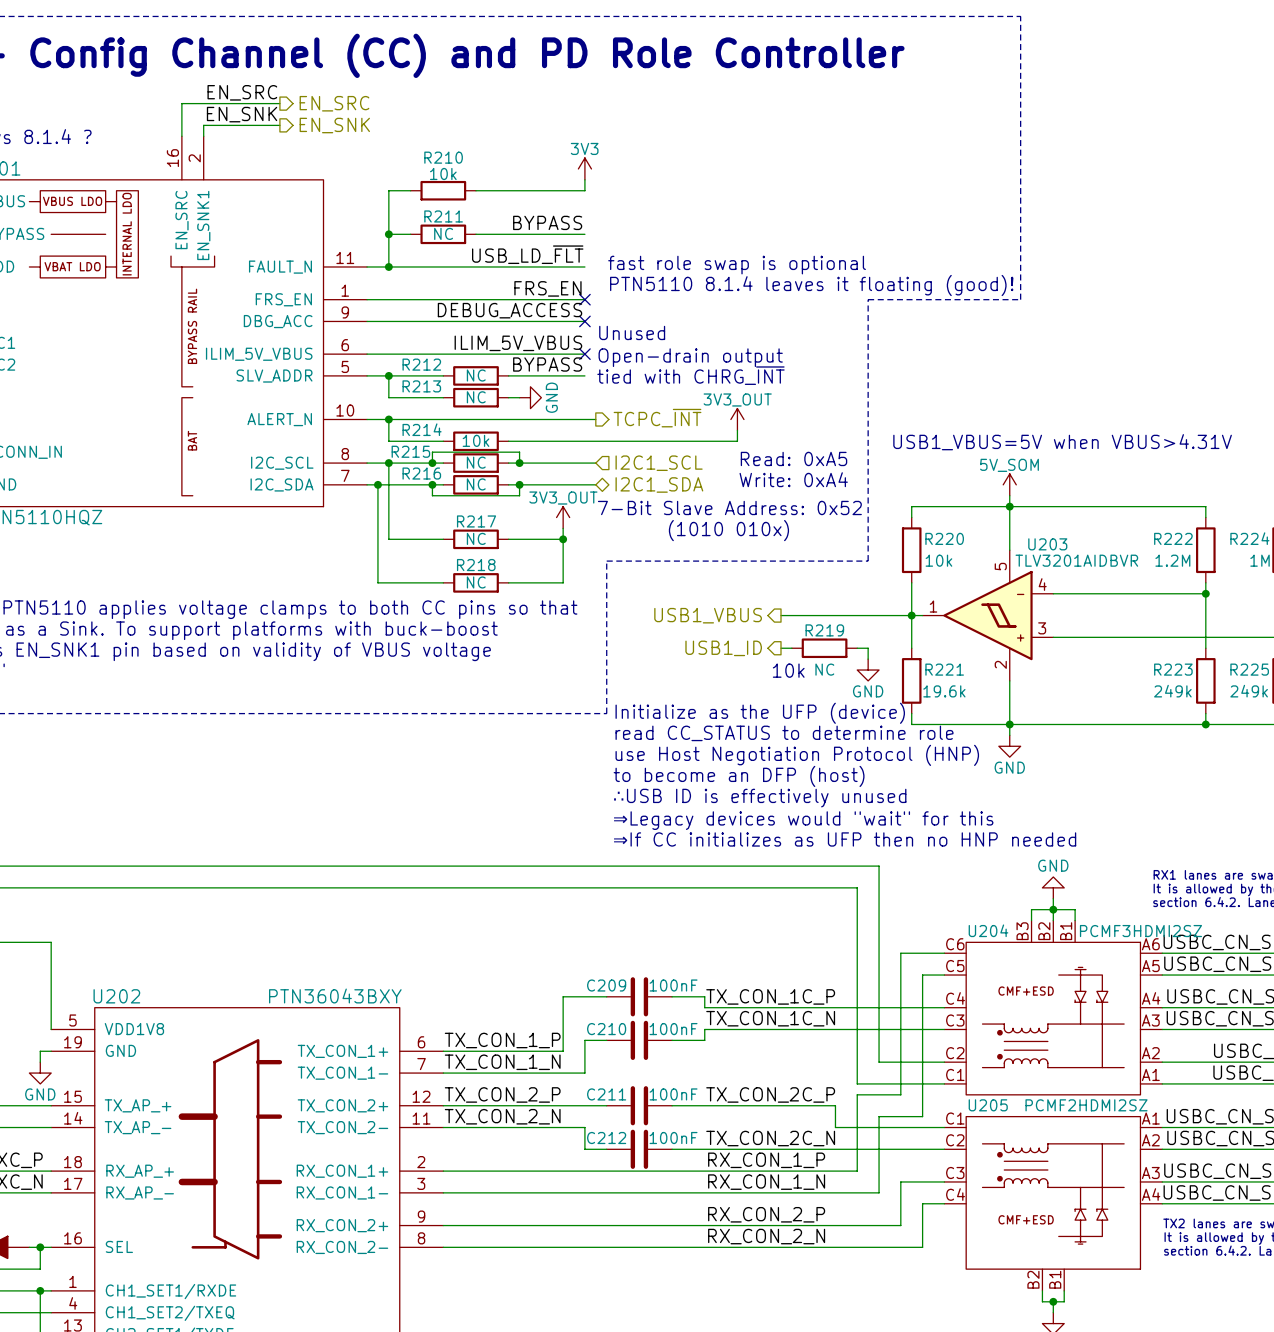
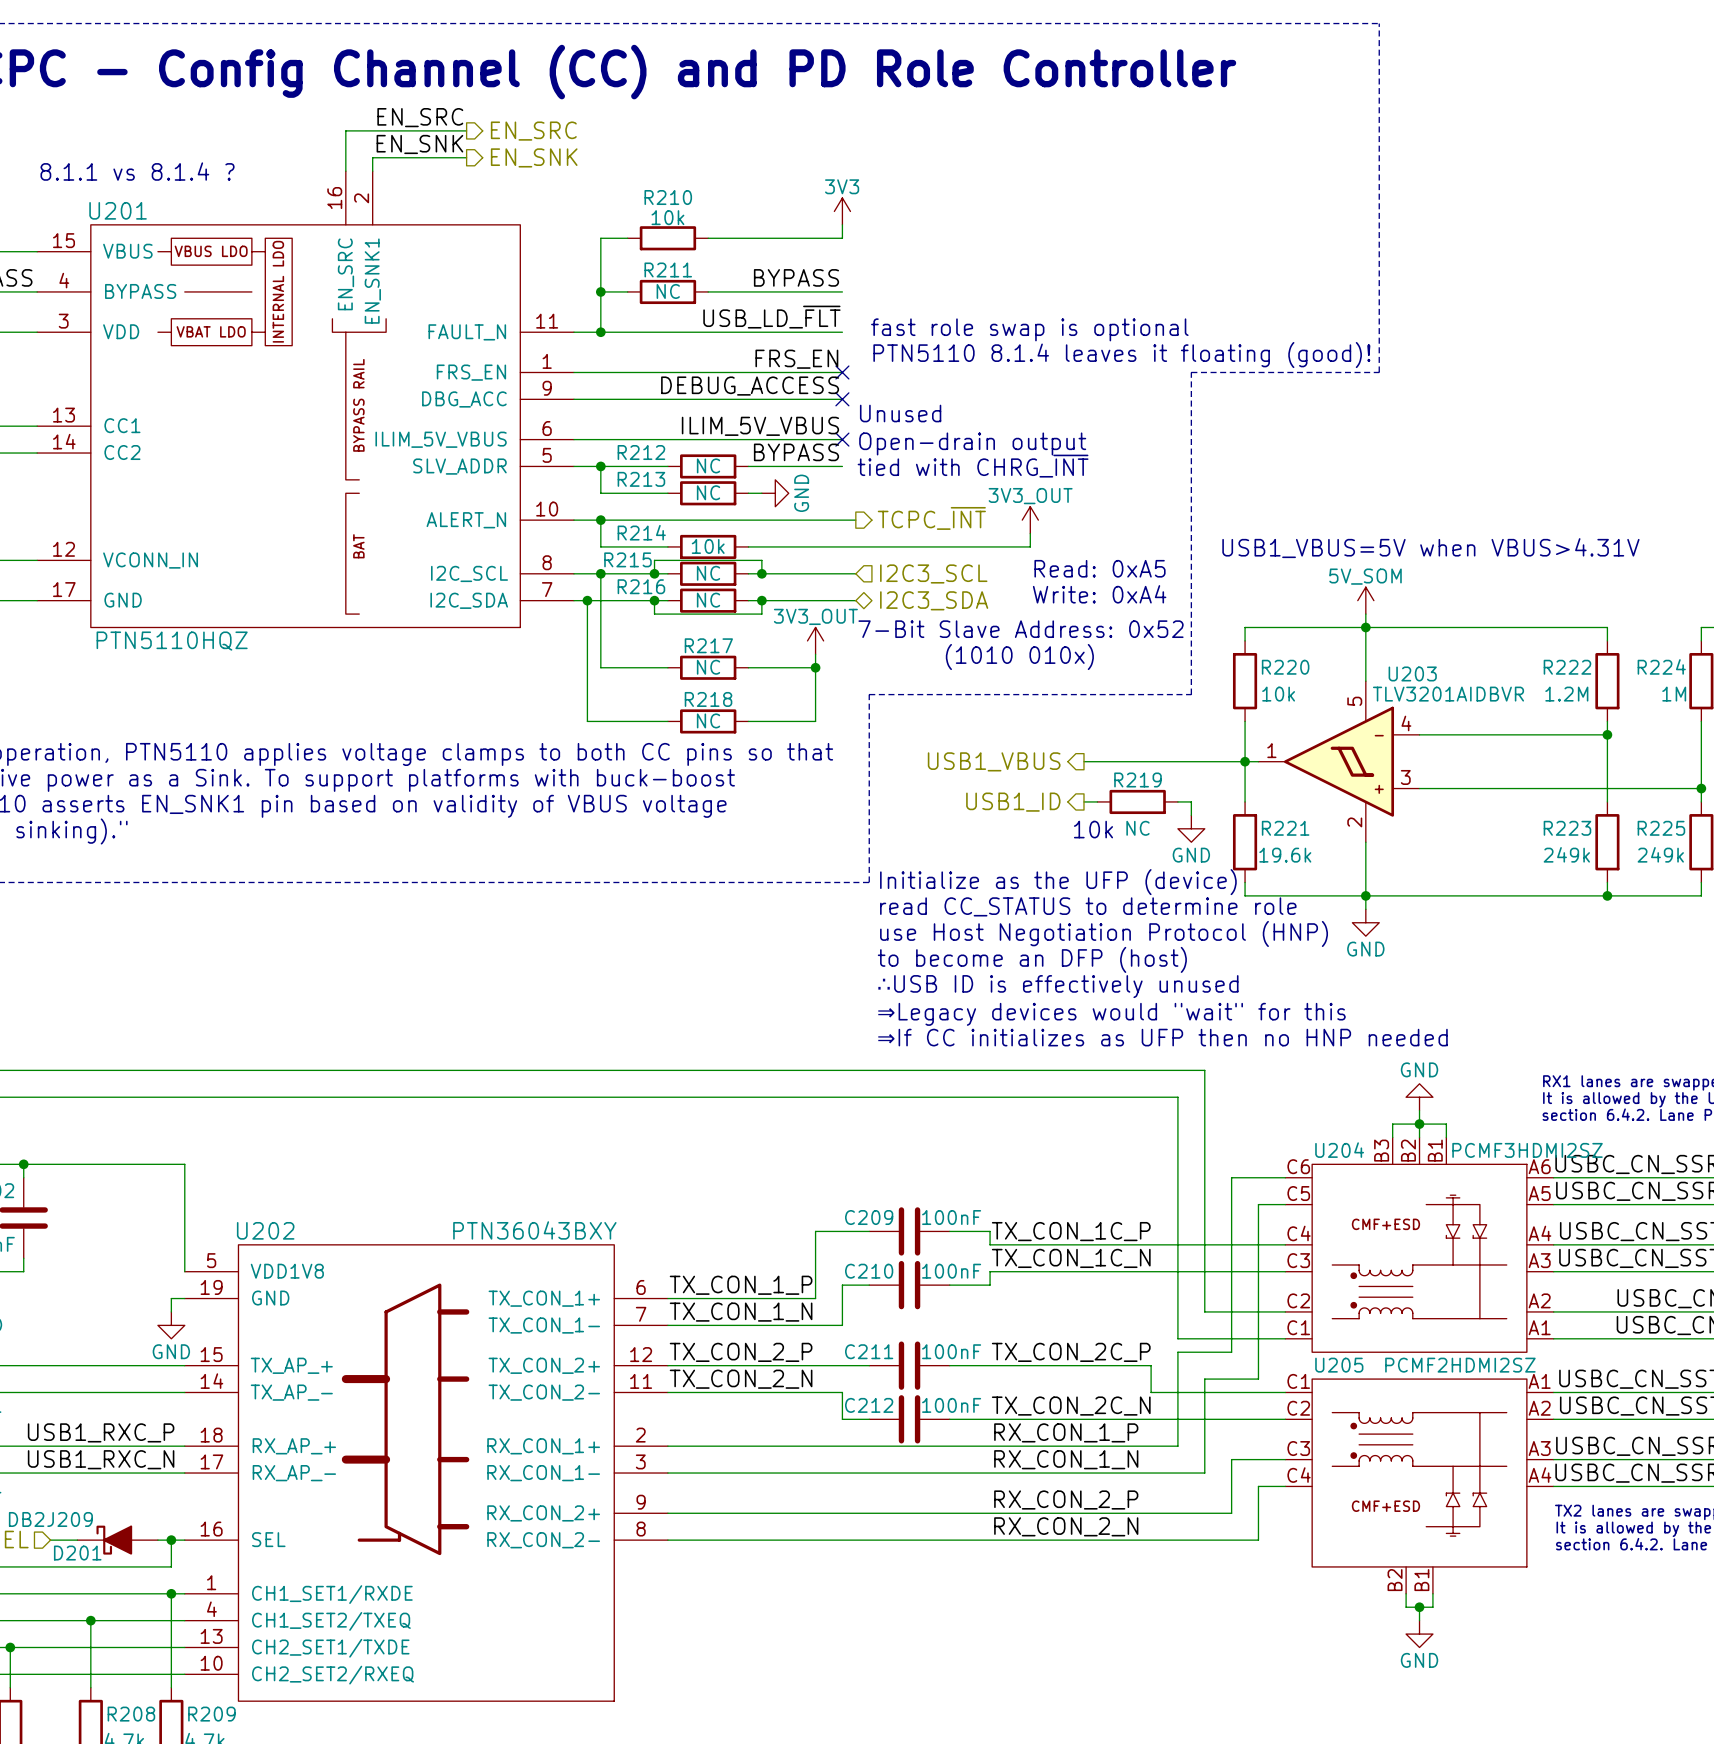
hierarchical label: I2C1_SCL (659, 463) -> I2C3_SCL (933, 573)
hierarchical label: I2C1_SDA (659, 484) -> I2C3_SDA (934, 600)

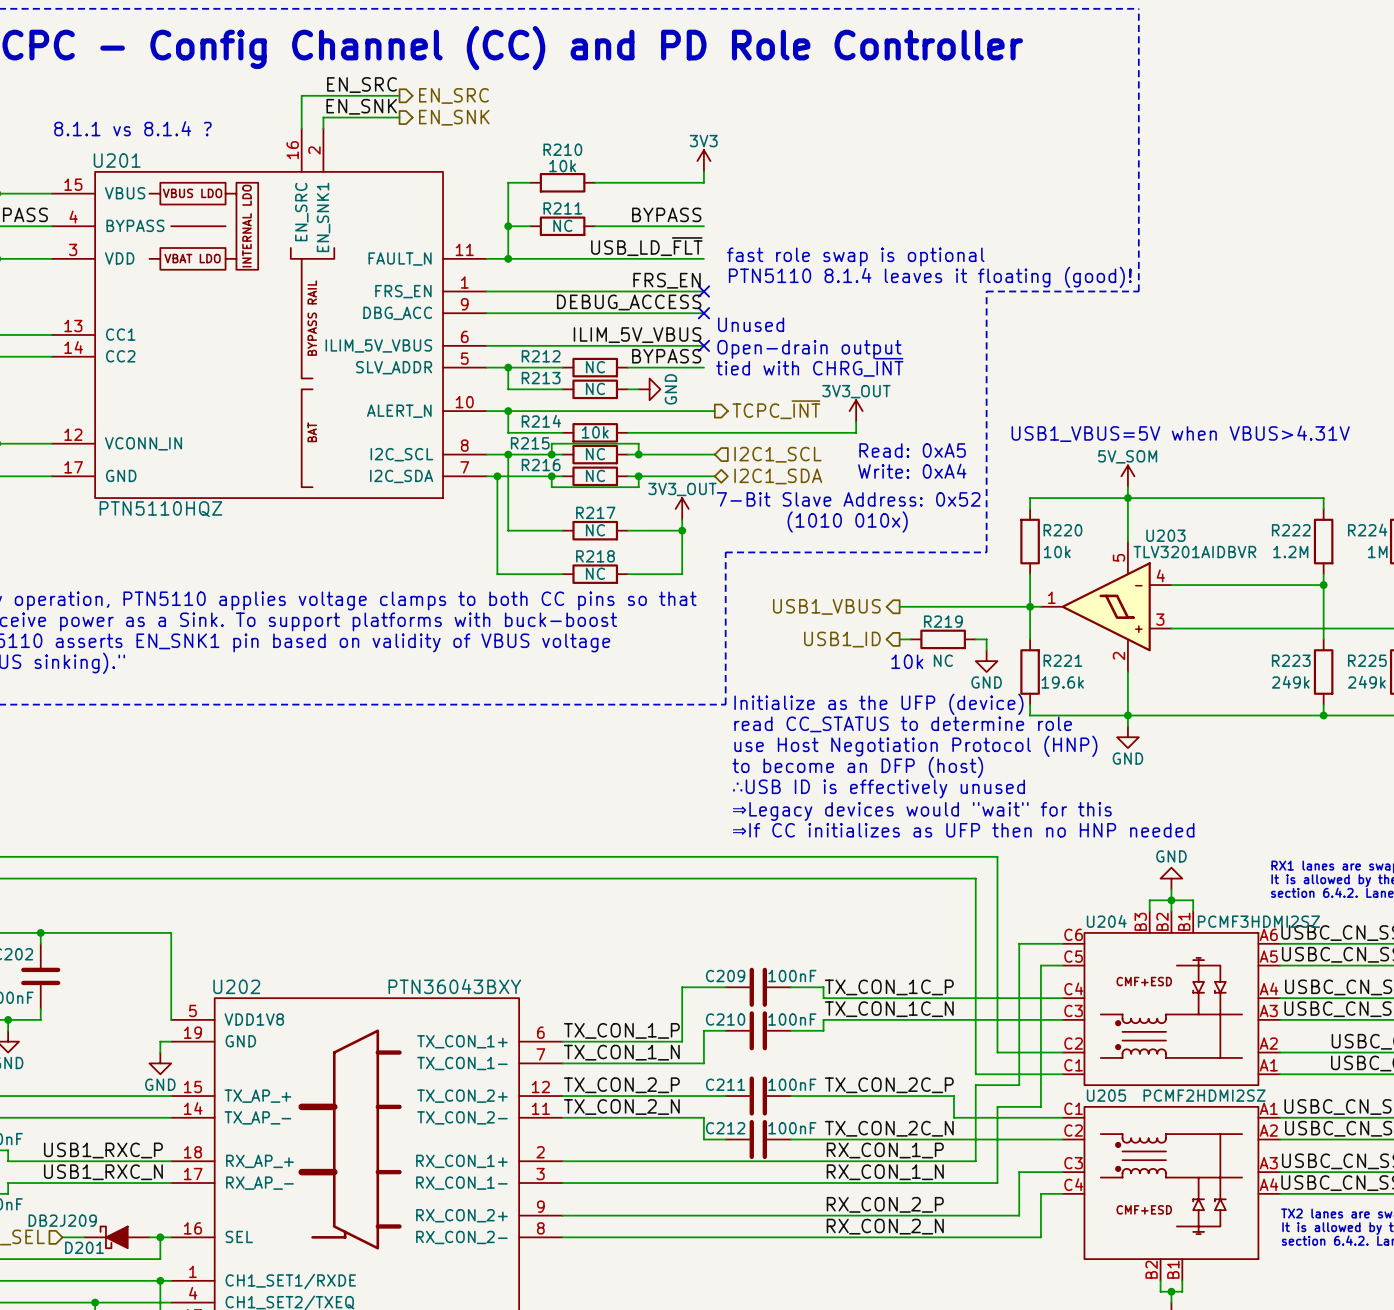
hierarchical label: I2C3_SCL (933, 573) -> I2C1_SCL (777, 454)
hierarchical label: I2C3_SDA (934, 600) -> I2C1_SDA (778, 476)

